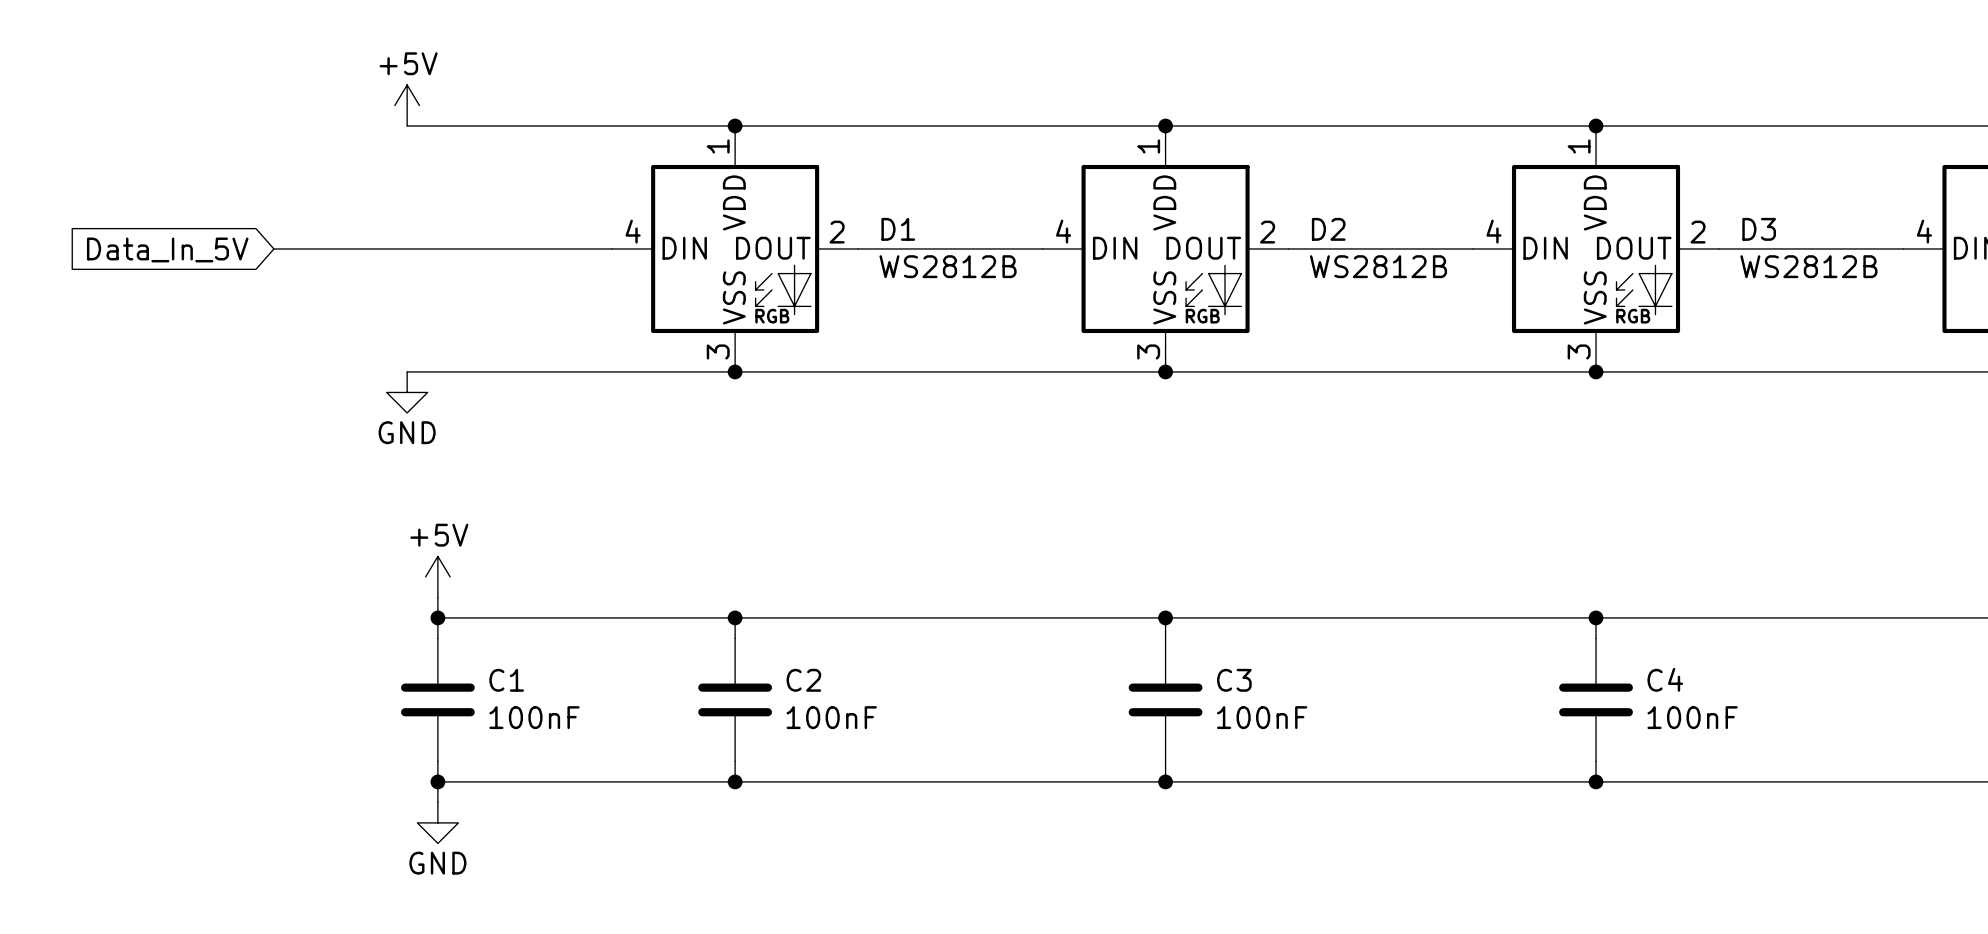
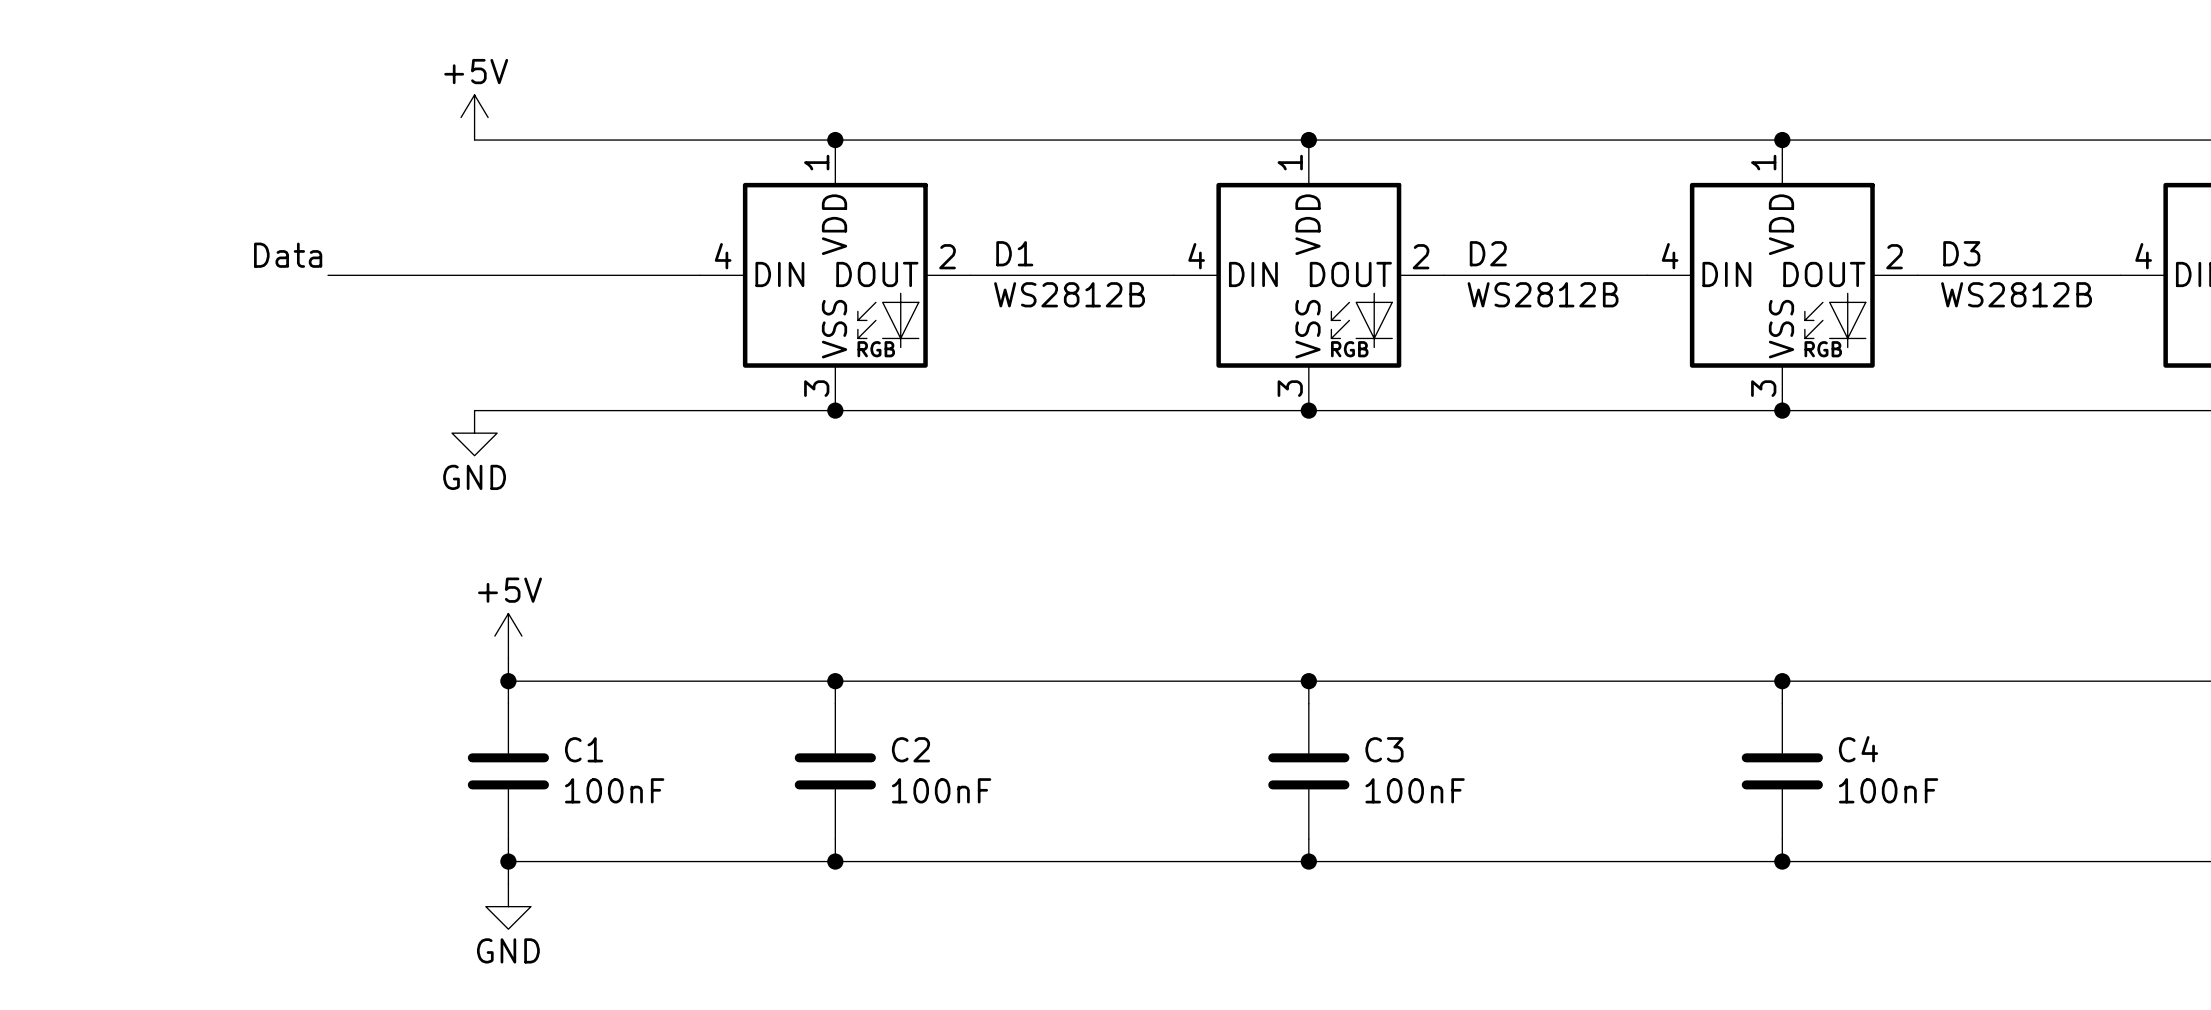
label: none -> Data (288, 255)
global label: Data_In_5V (167, 249) -> none

